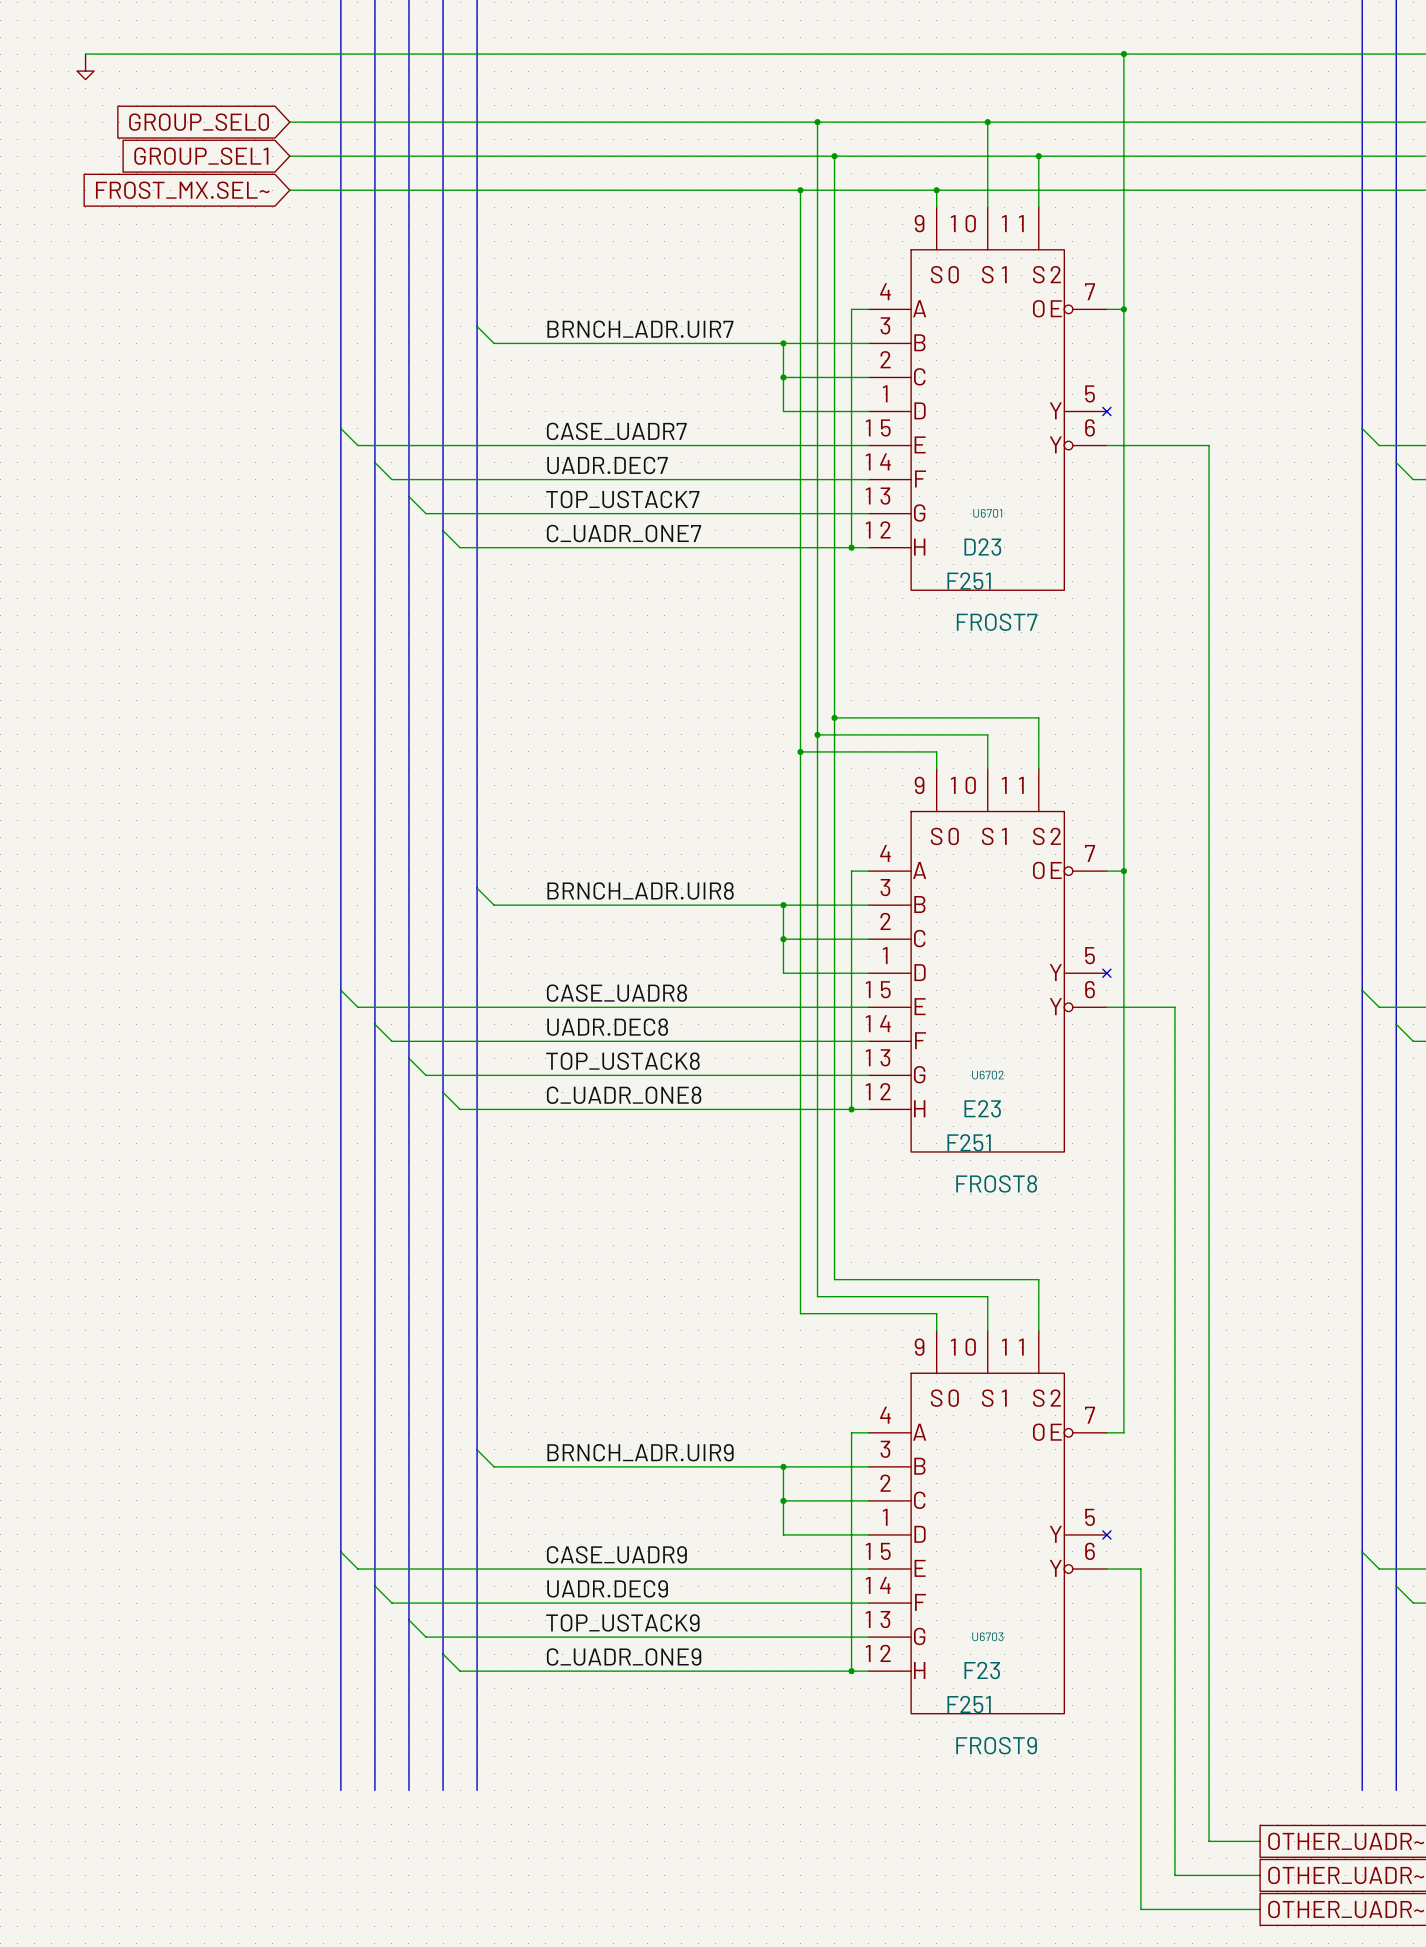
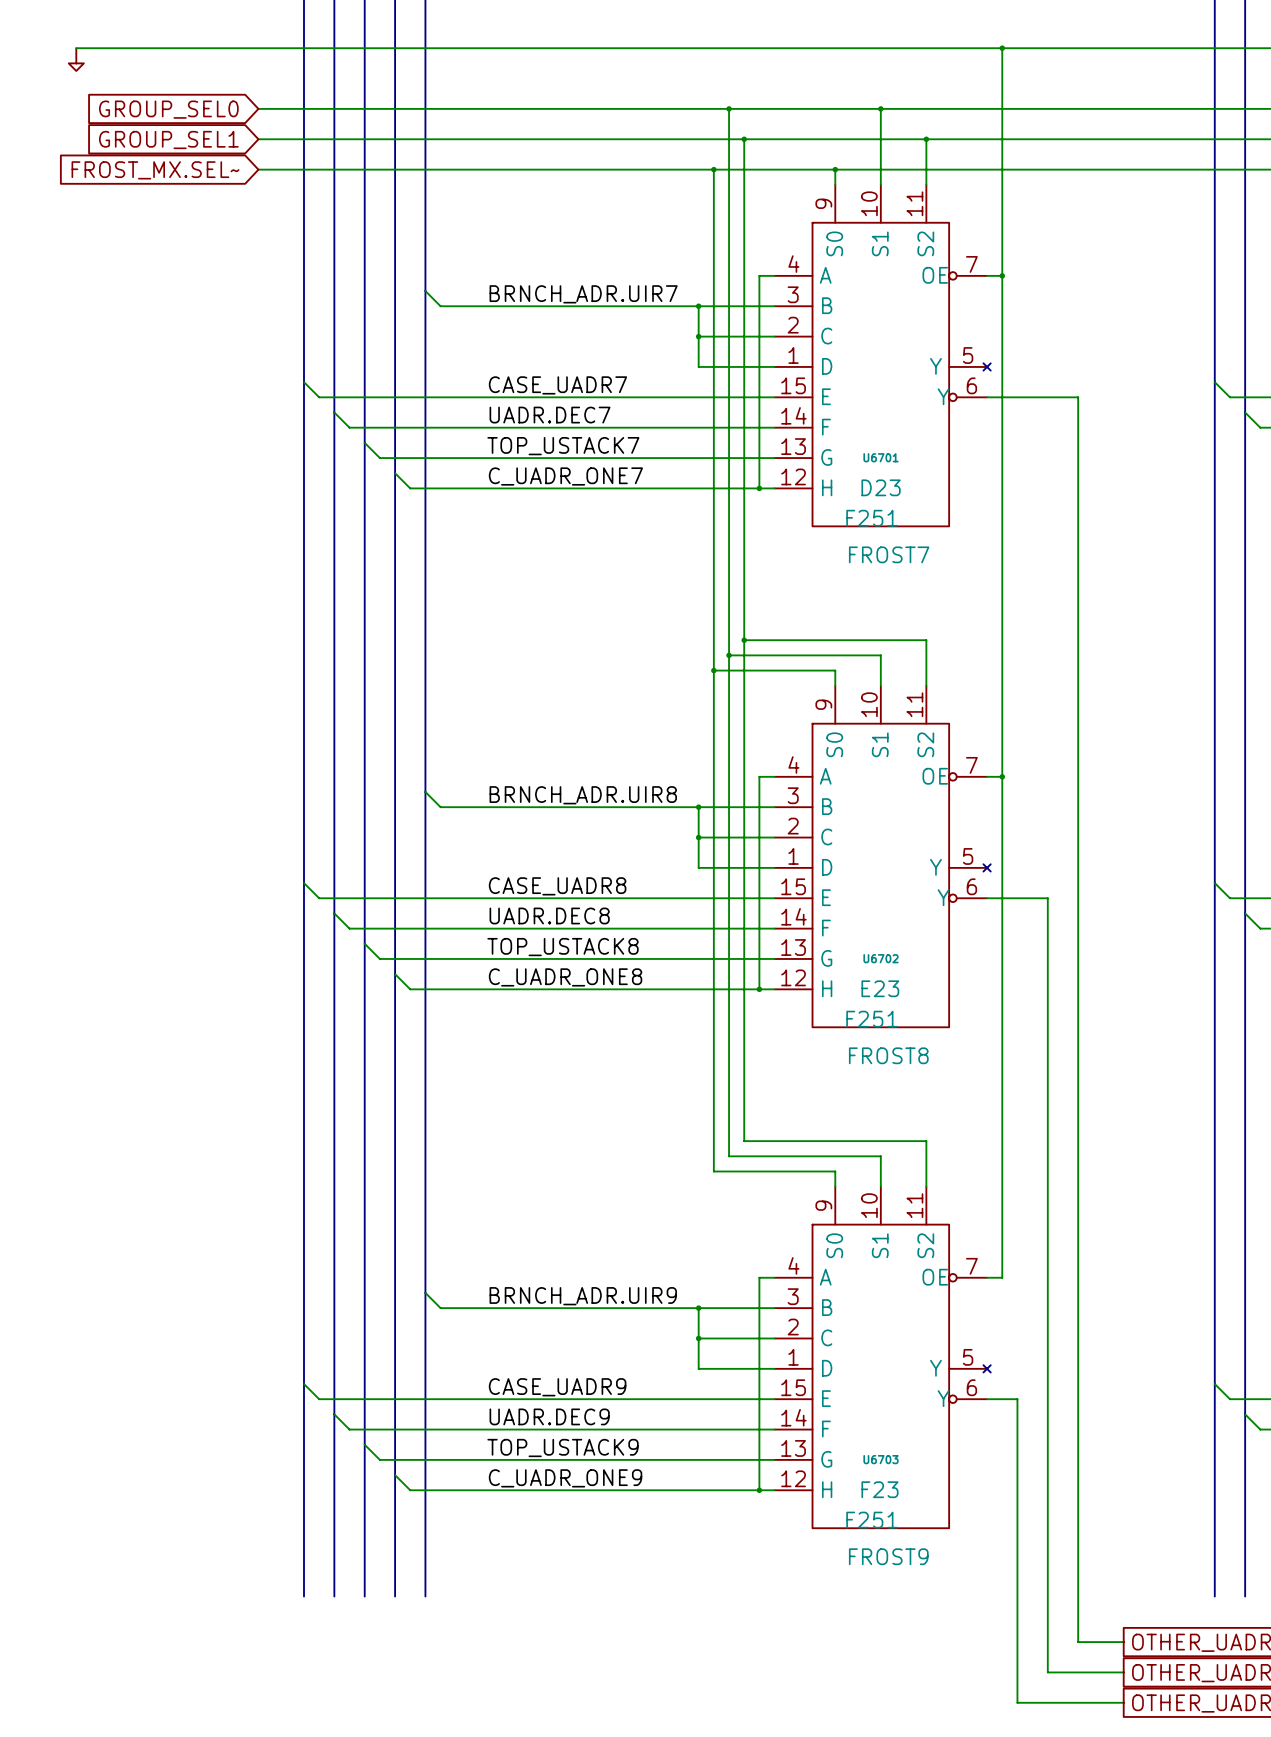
U6701 symbol: [868, 207, 1107, 591] -> [774, 184, 988, 527]
U6702 symbol: [868, 768, 1107, 1152] -> [774, 685, 988, 1028]
U6703 symbol: [868, 1330, 1107, 1714] -> [774, 1186, 988, 1529]

